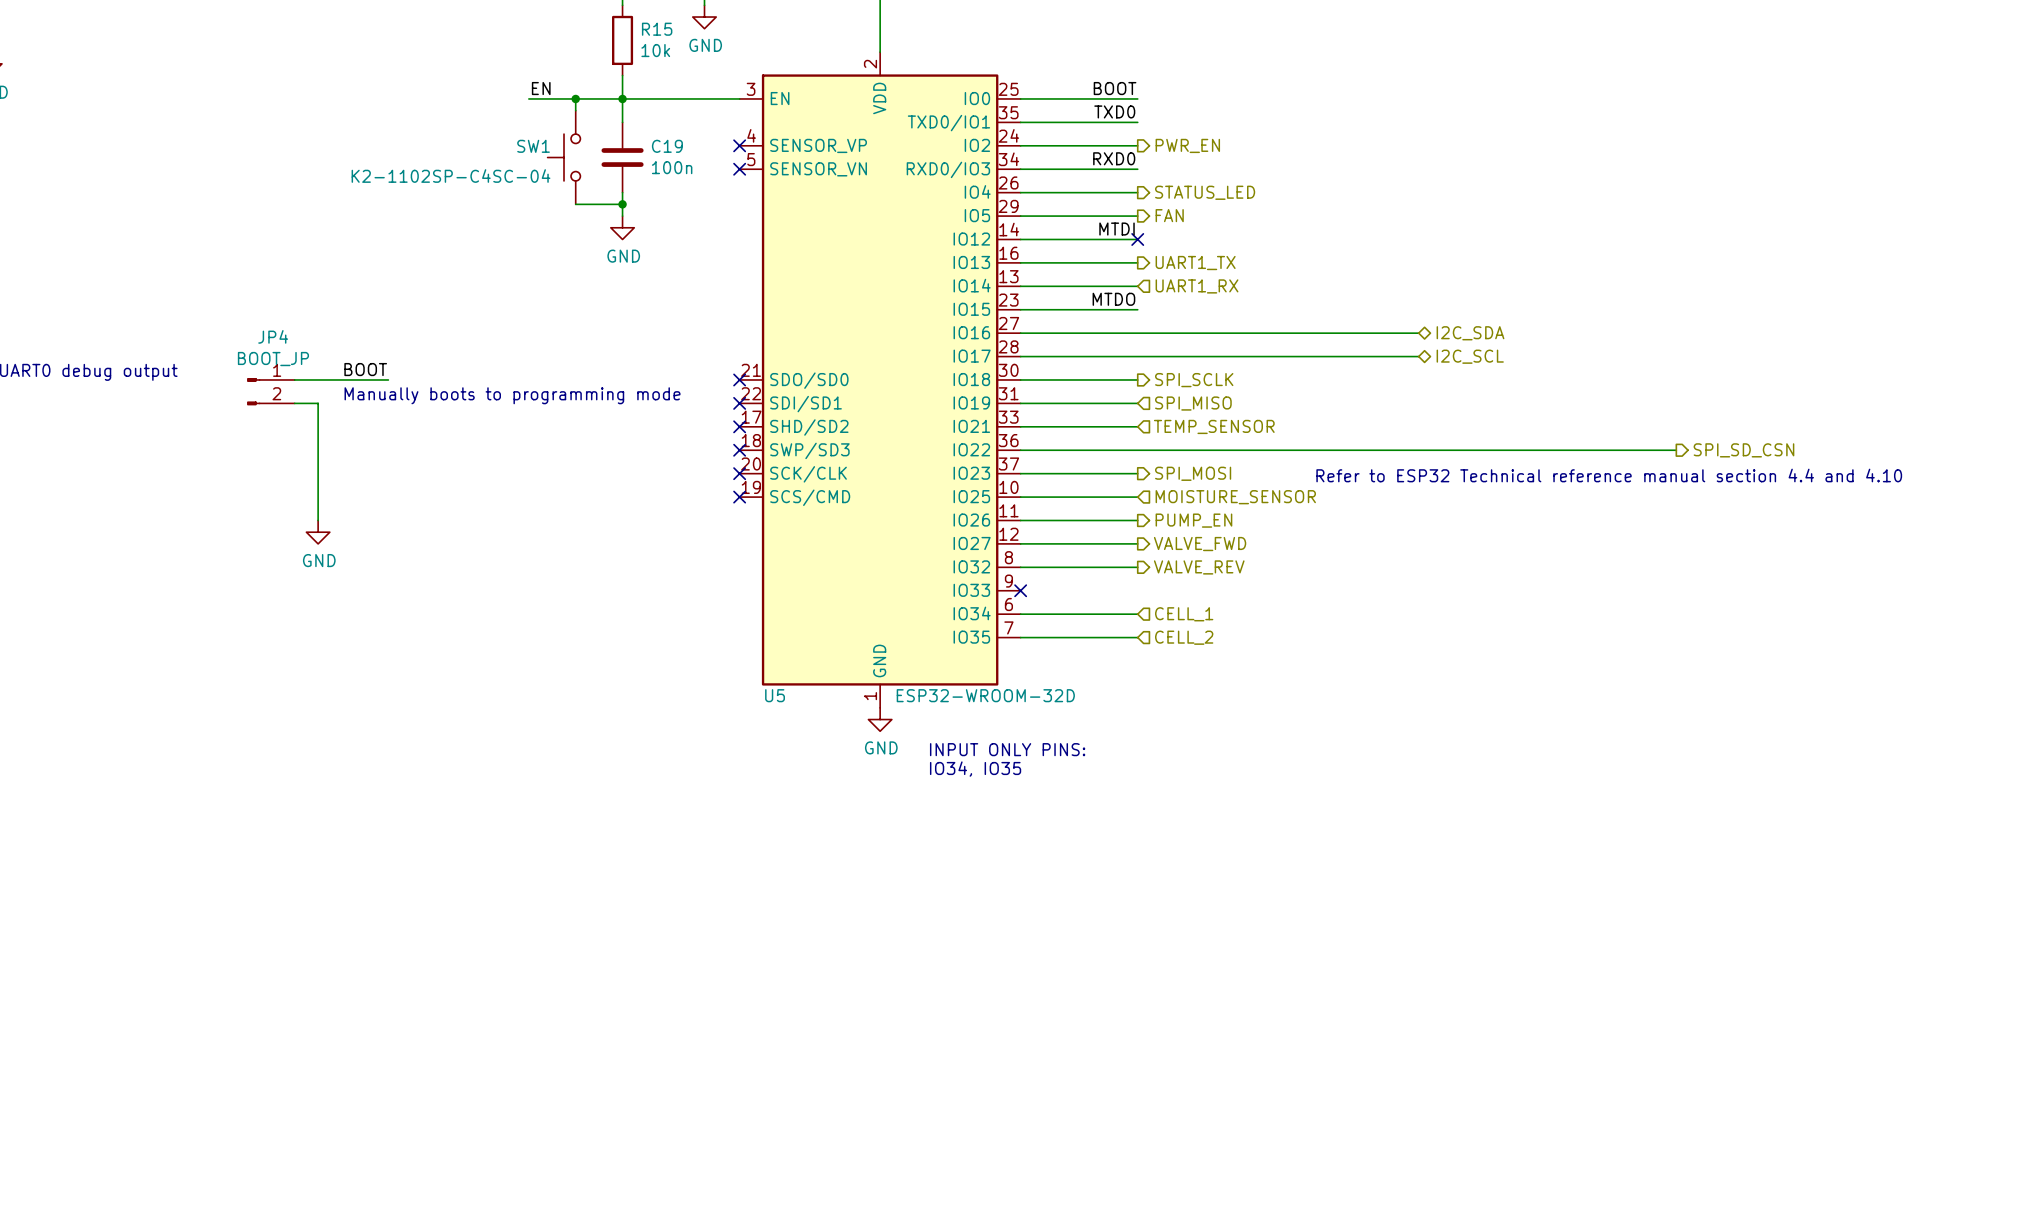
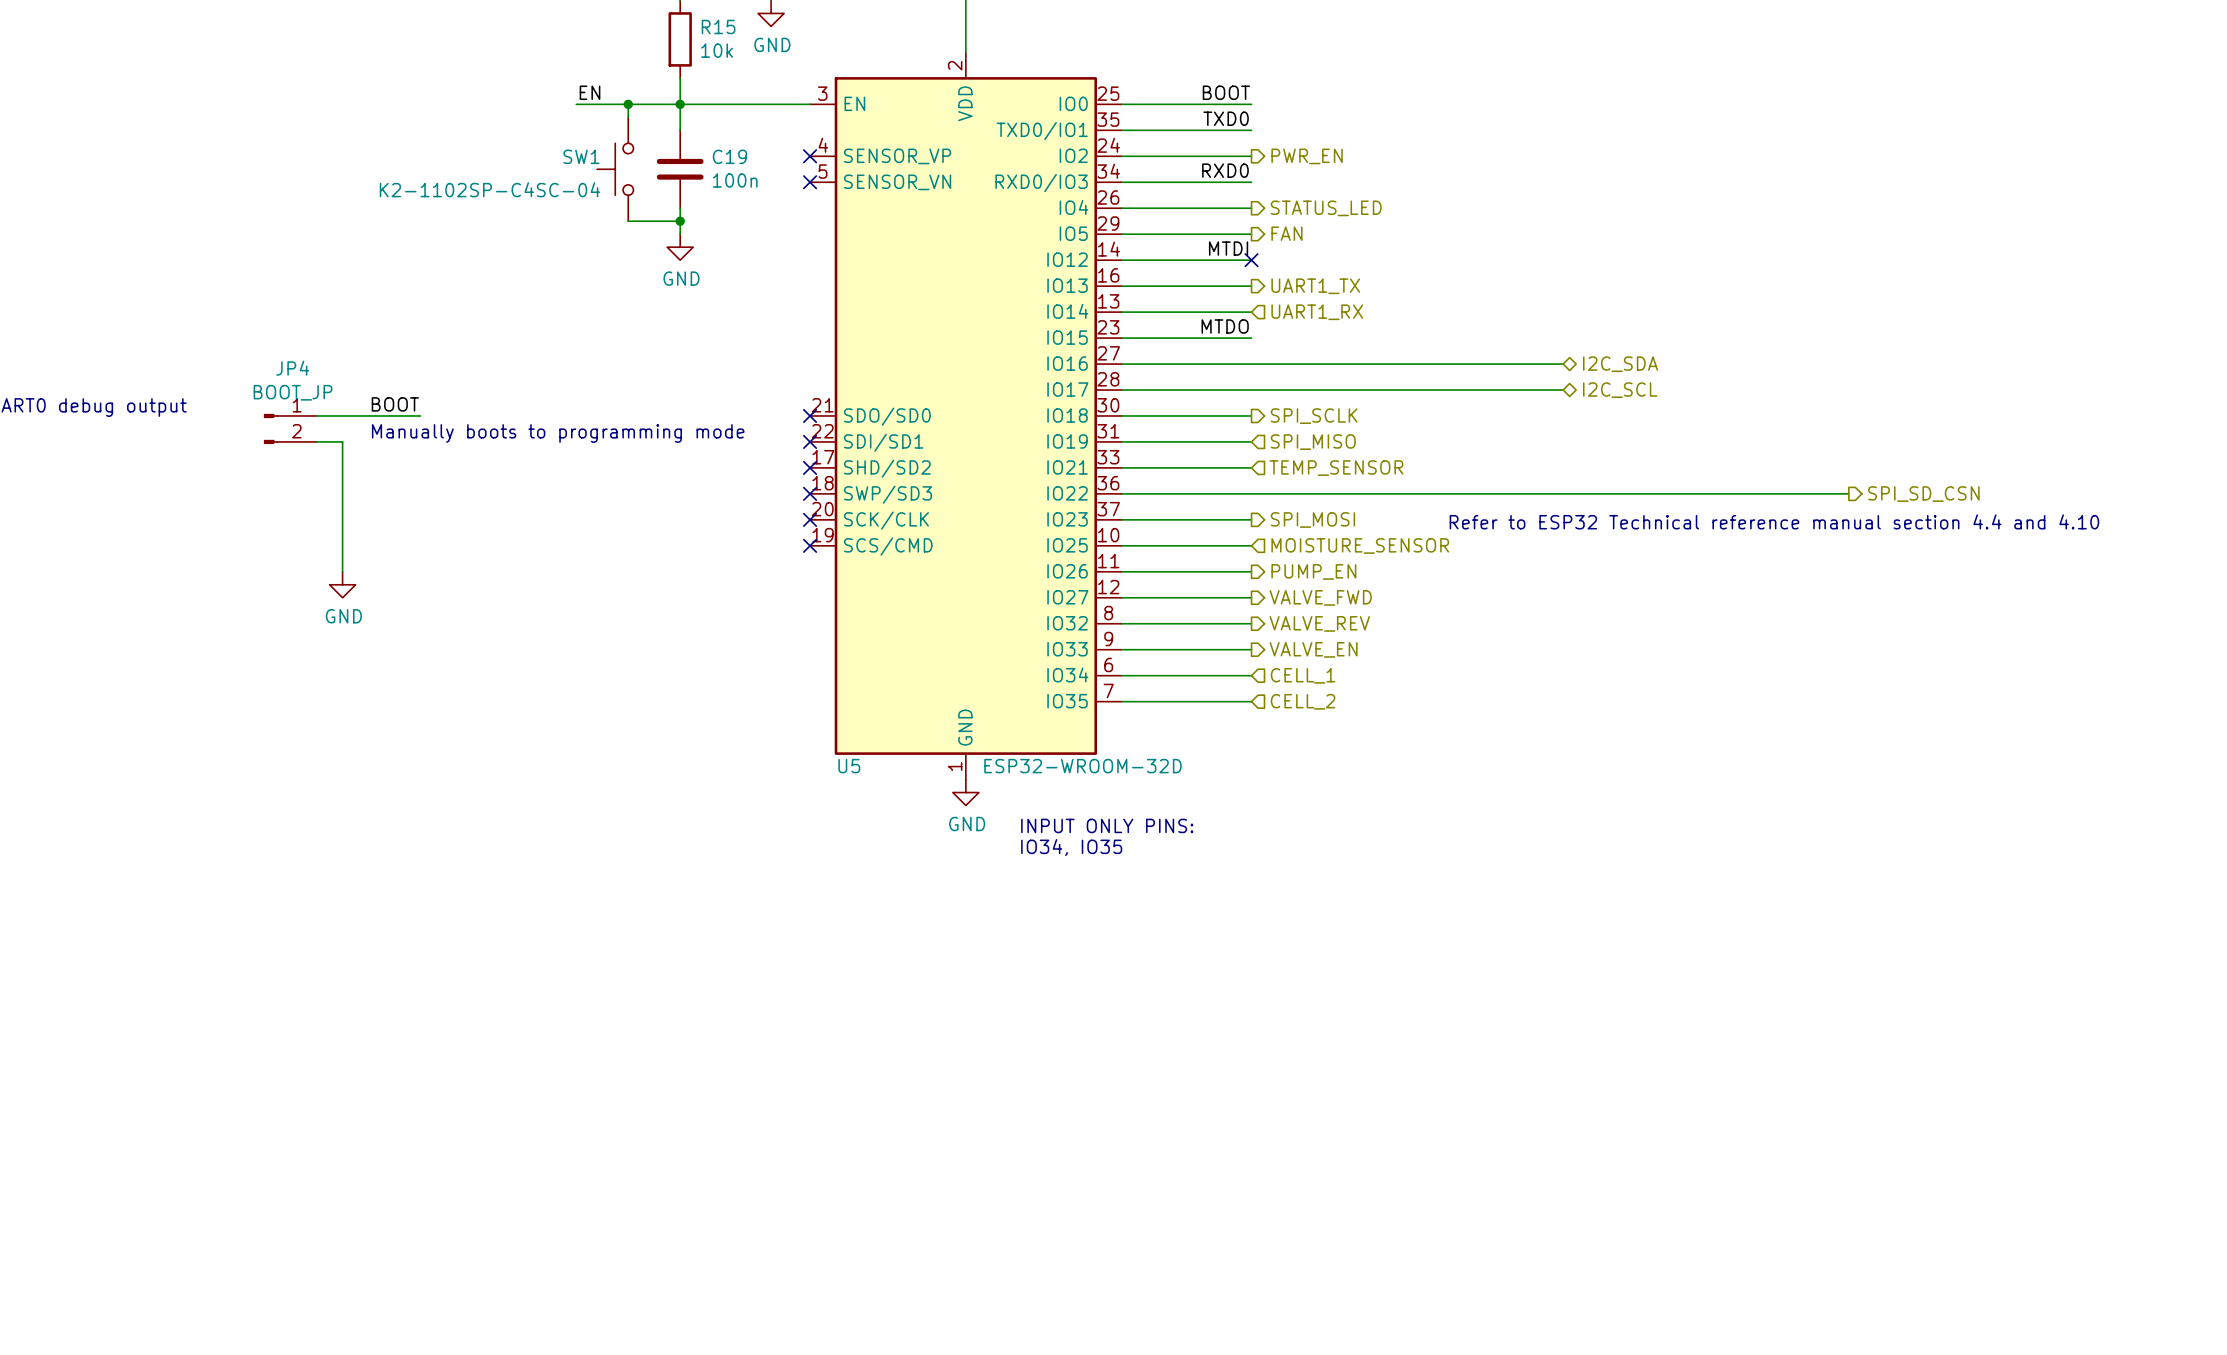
wire: none -> (1121, 649) (1251, 649)
no-connect mark: (1020, 590) -> none
hierarchical label: none -> VALVE_EN (1313, 649)

